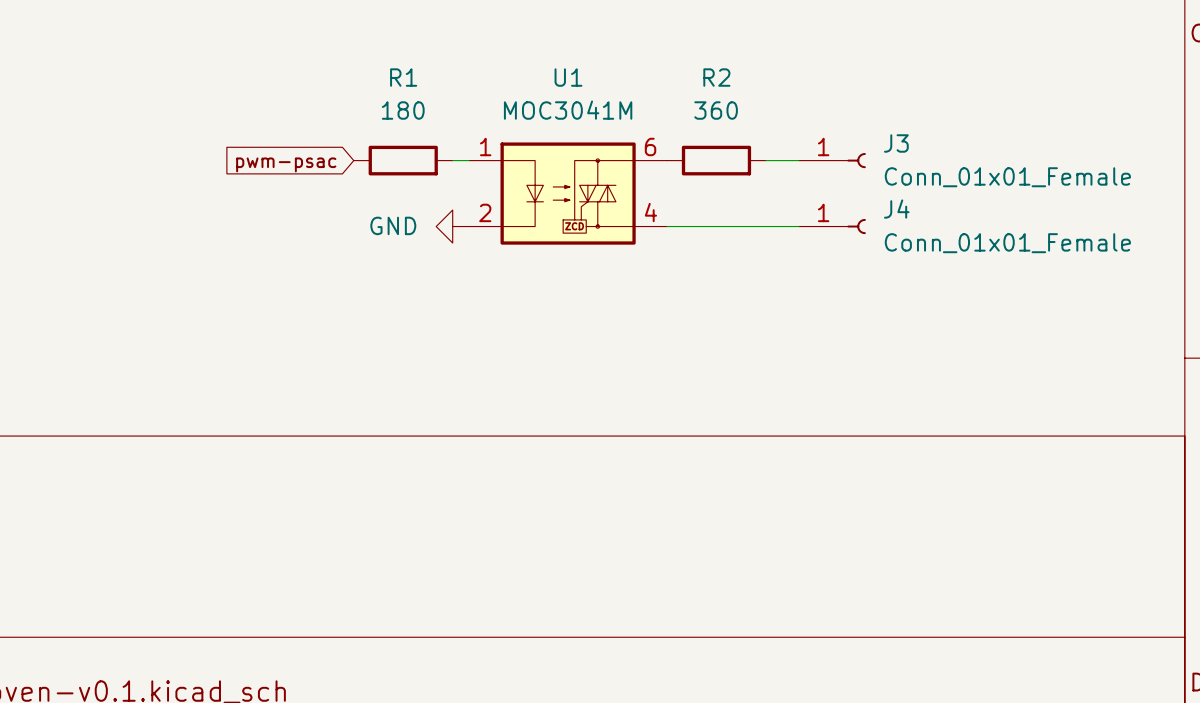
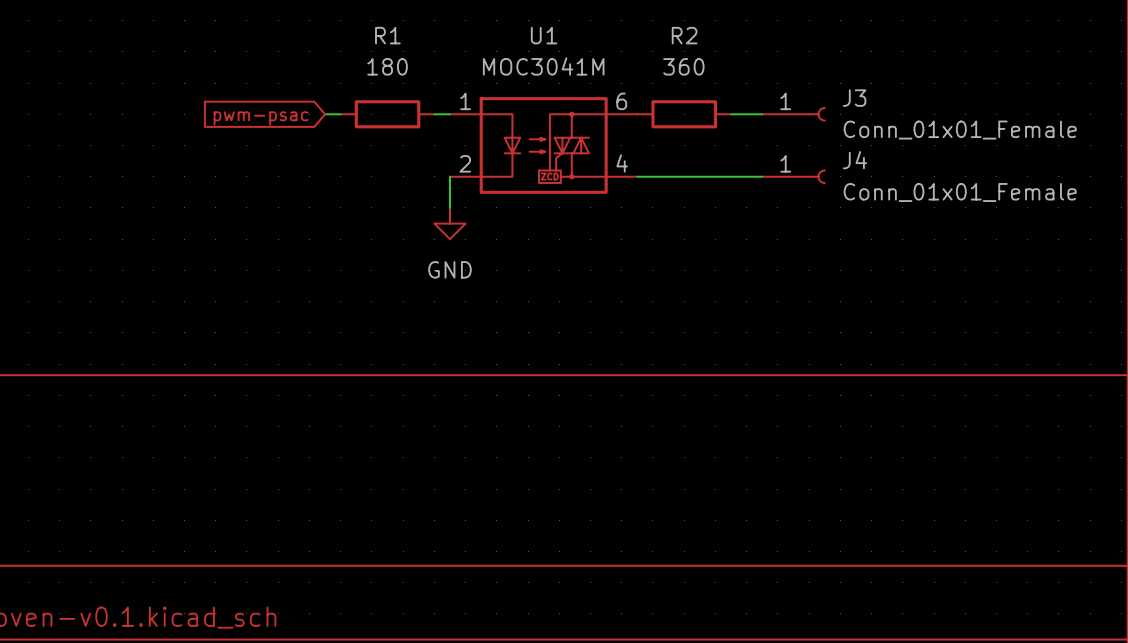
wire: none -> (325, 114) (340, 114)
global label position: pwm-psac (286, 164) -> pwm-psac (261, 118)
power symbol rotation: 0° (452, 226) -> 90° counterclockwise (449, 223)
power symbol position: GND (452, 226) -> GND (449, 223)
wire: none -> (449, 176) (449, 207)

